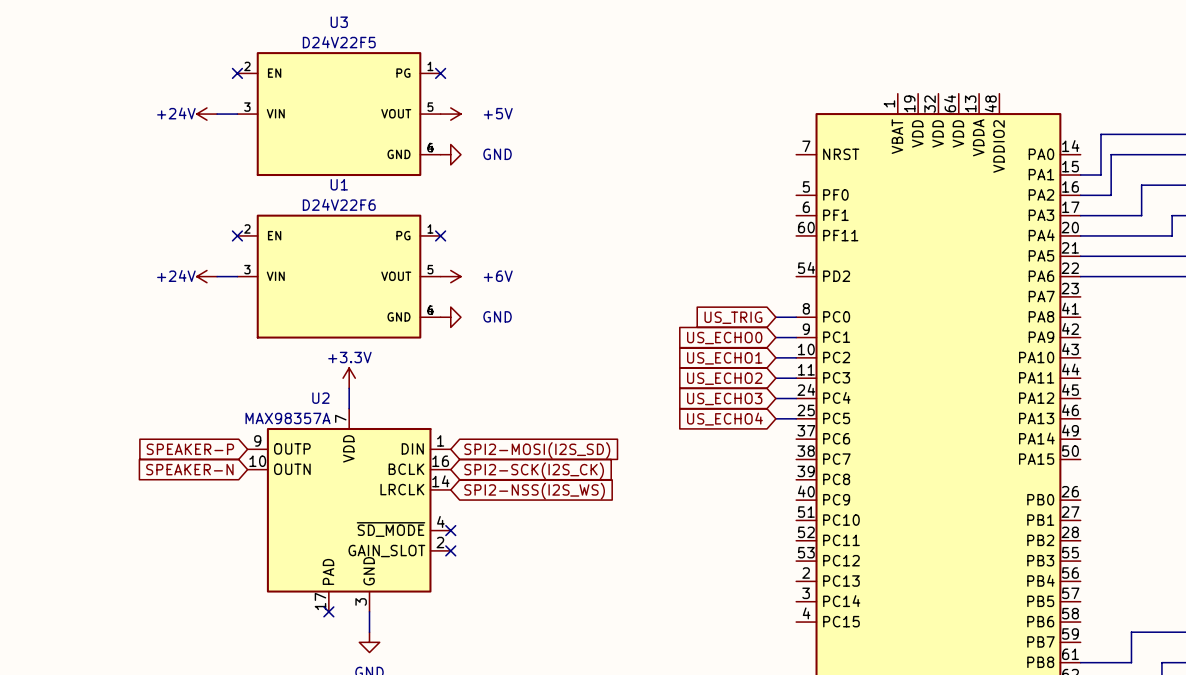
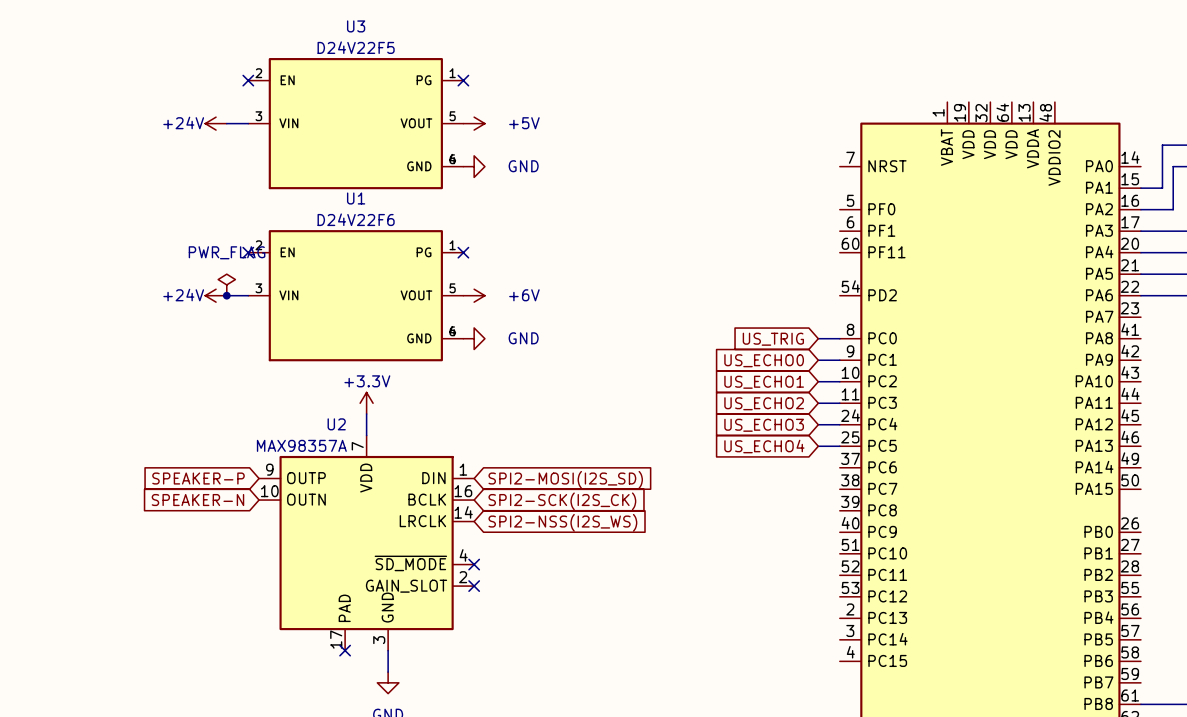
power symbol: none -> PWR_FLAG (226, 284)
junction: none -> (226, 295)

